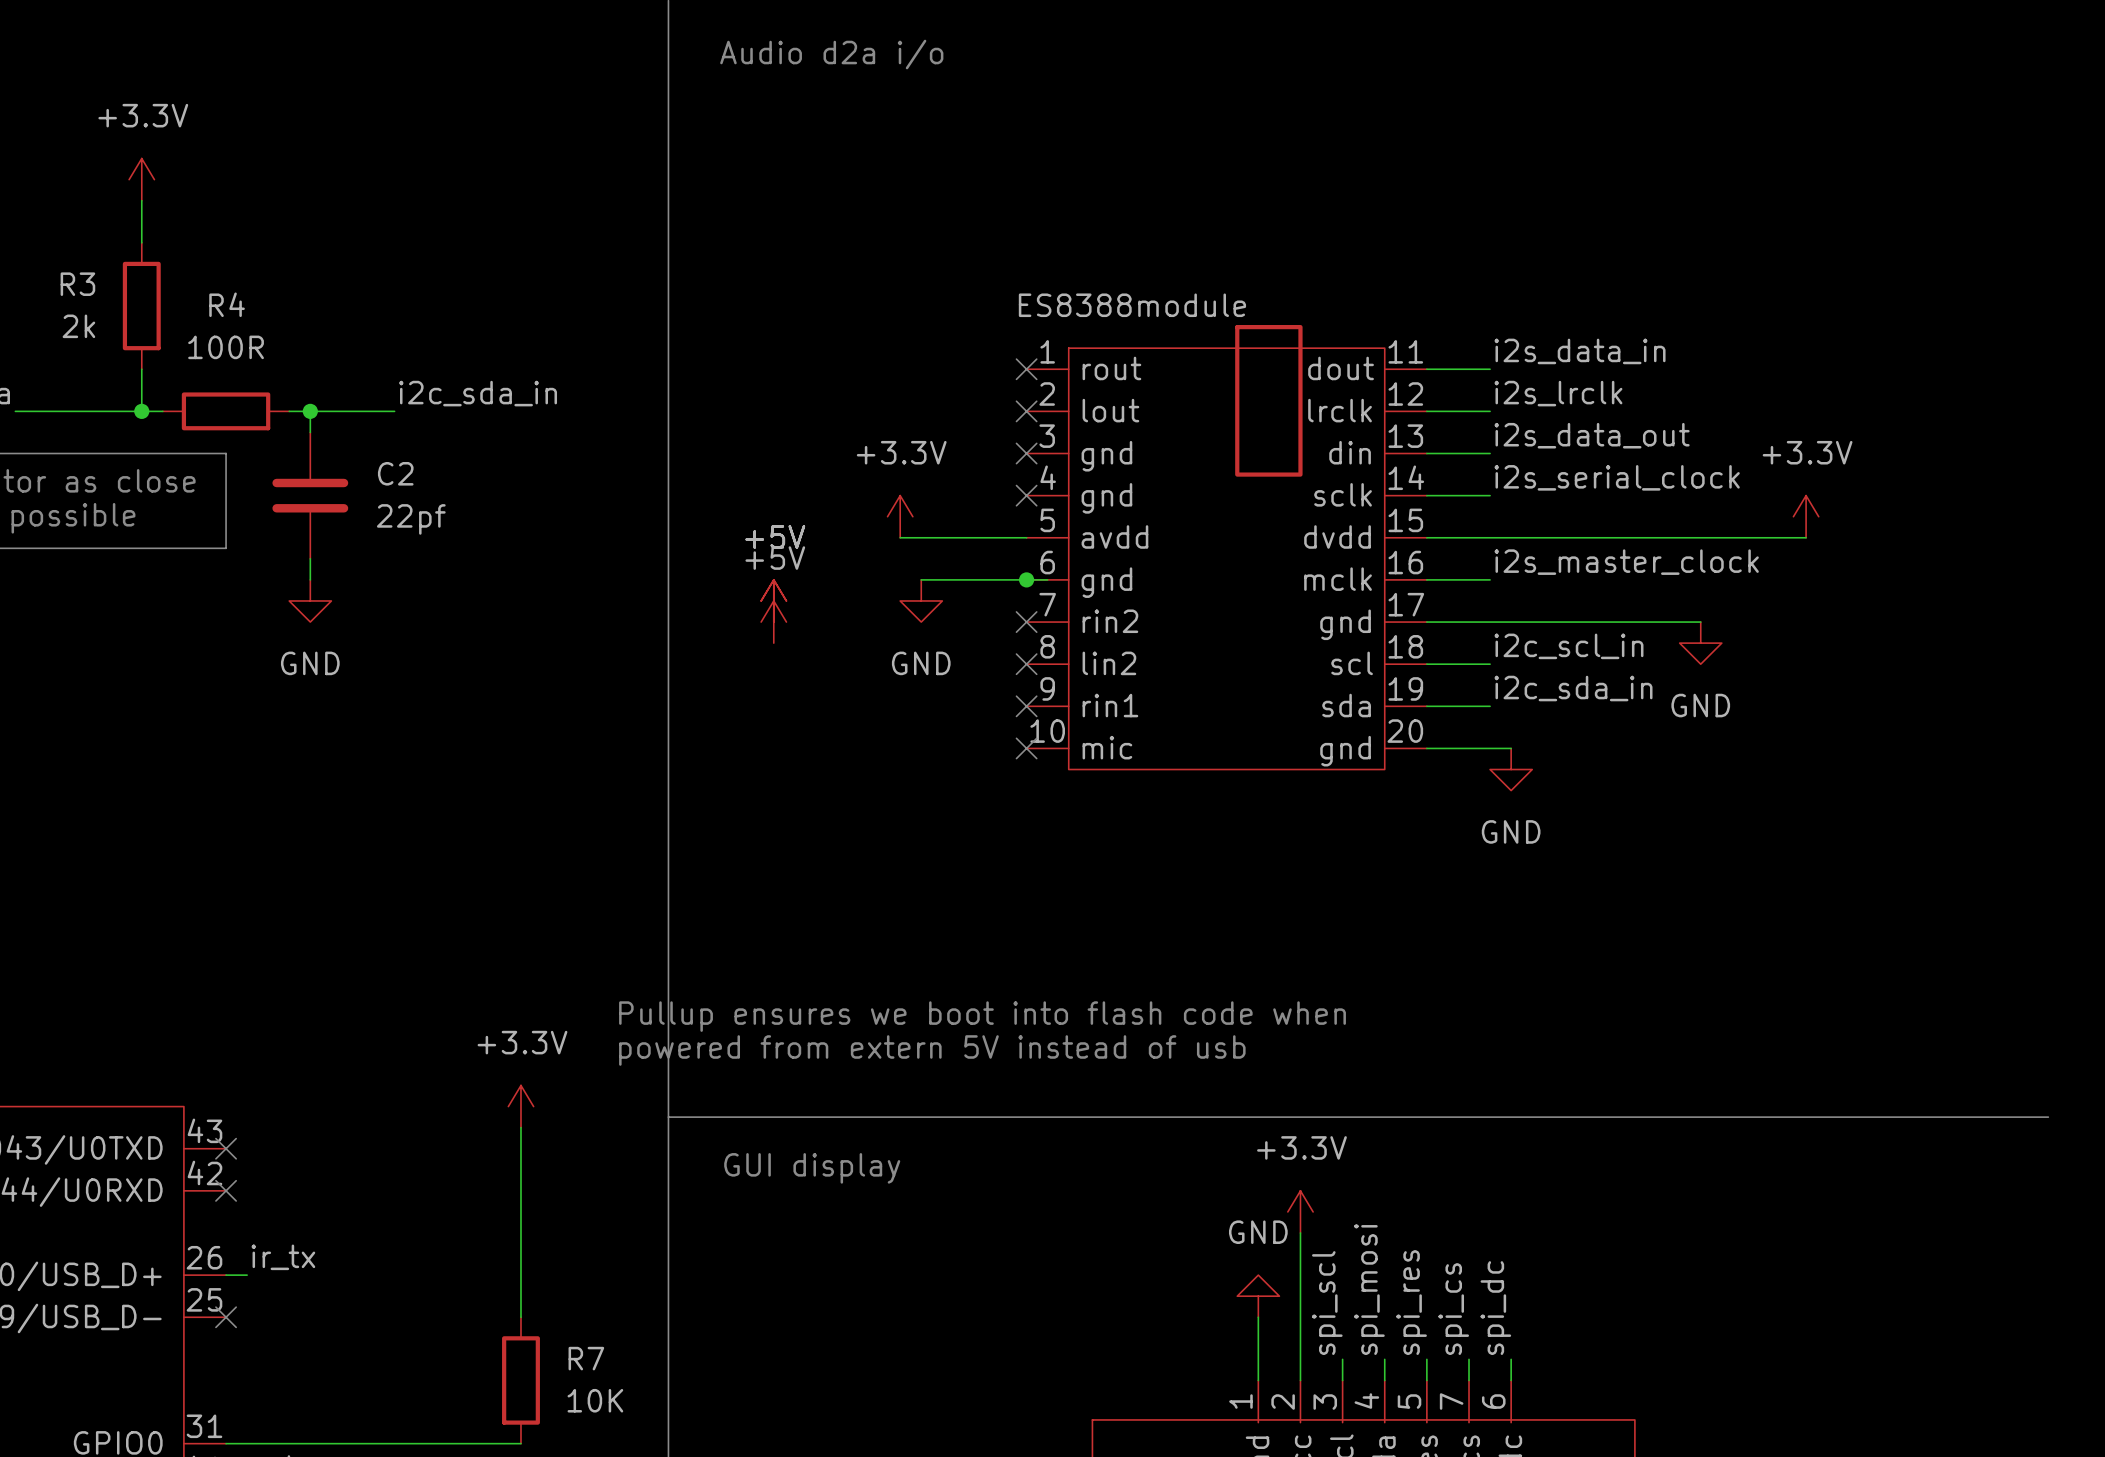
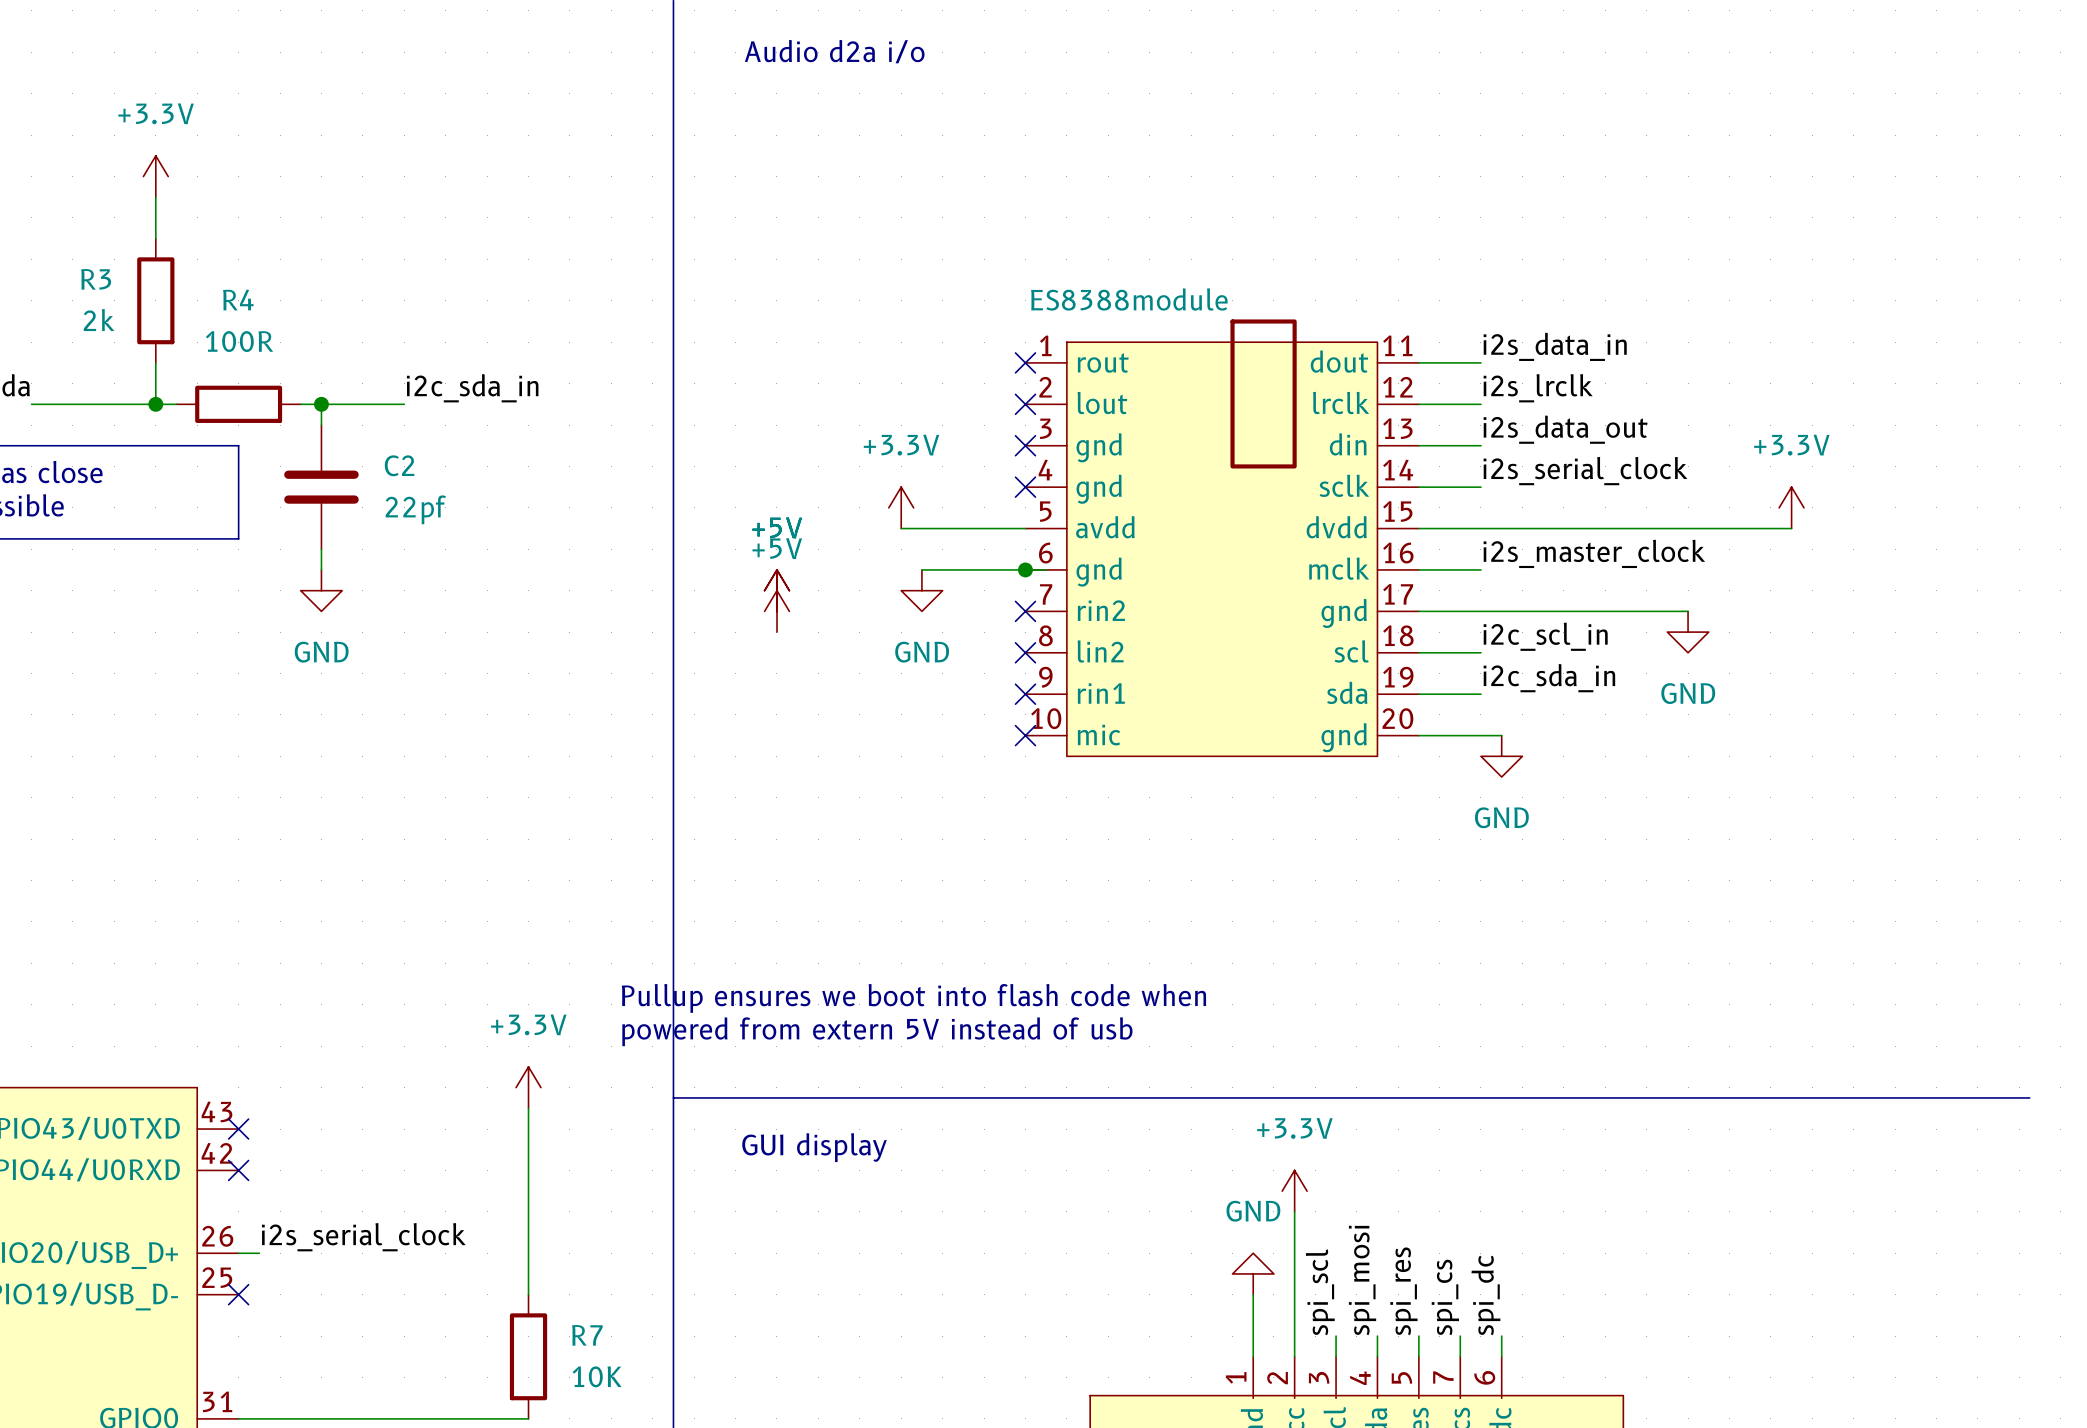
label: ir_tx (283, 1257) -> i2s_serial_clock (363, 1237)

